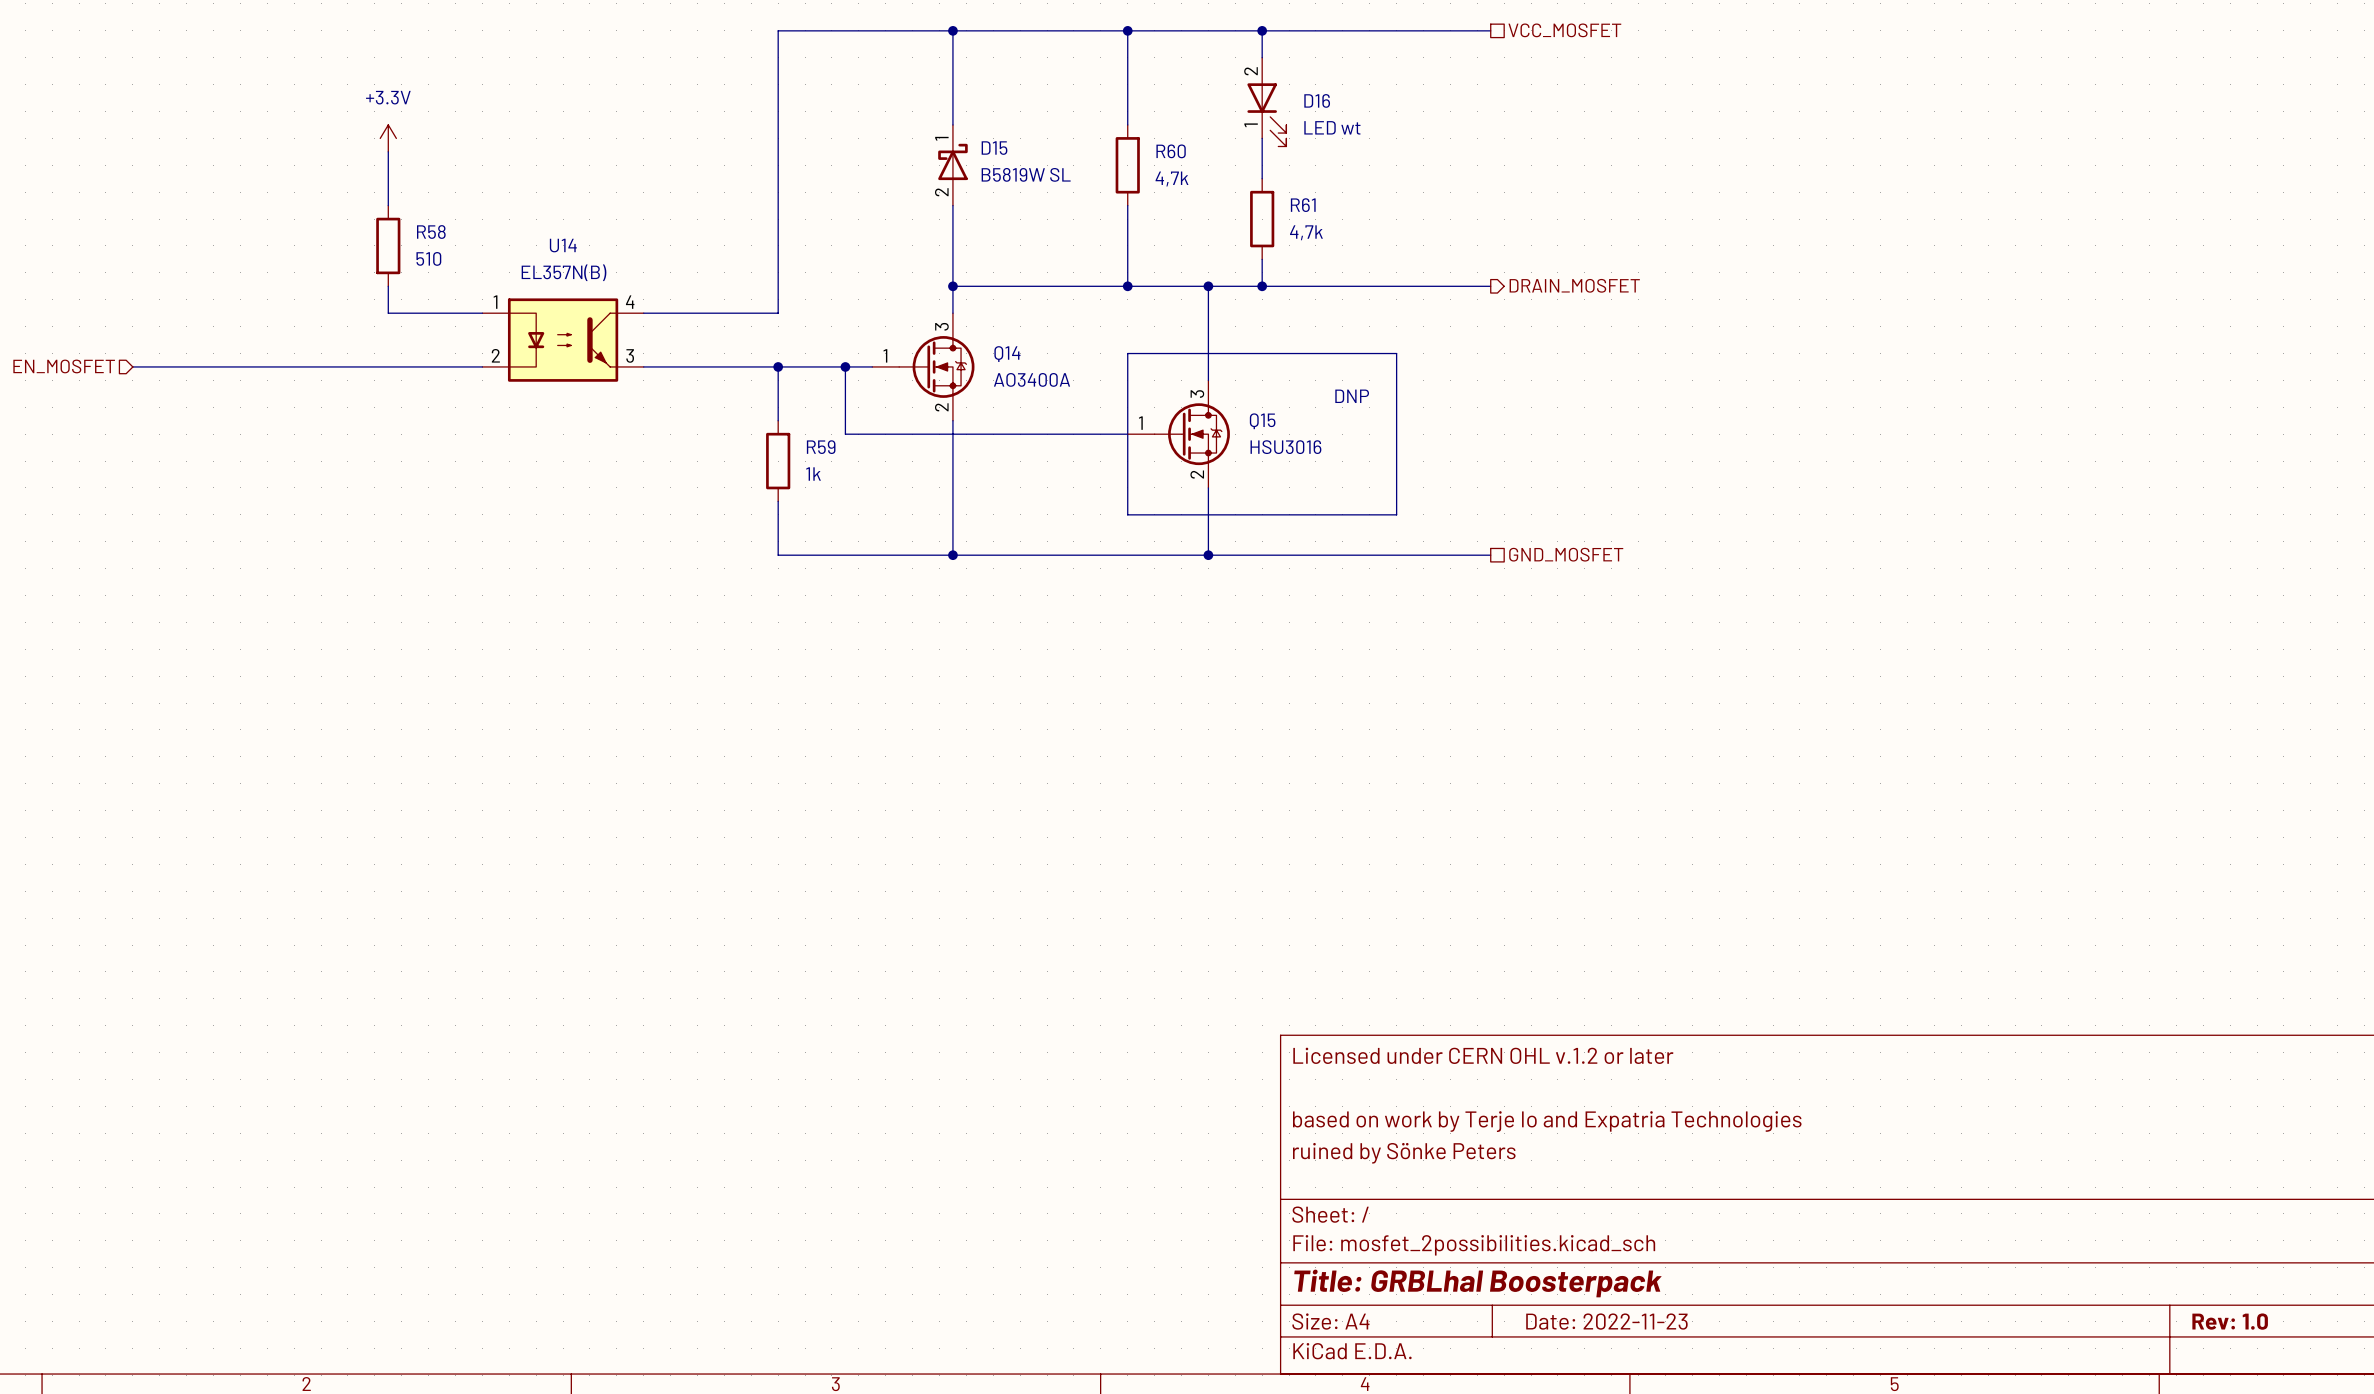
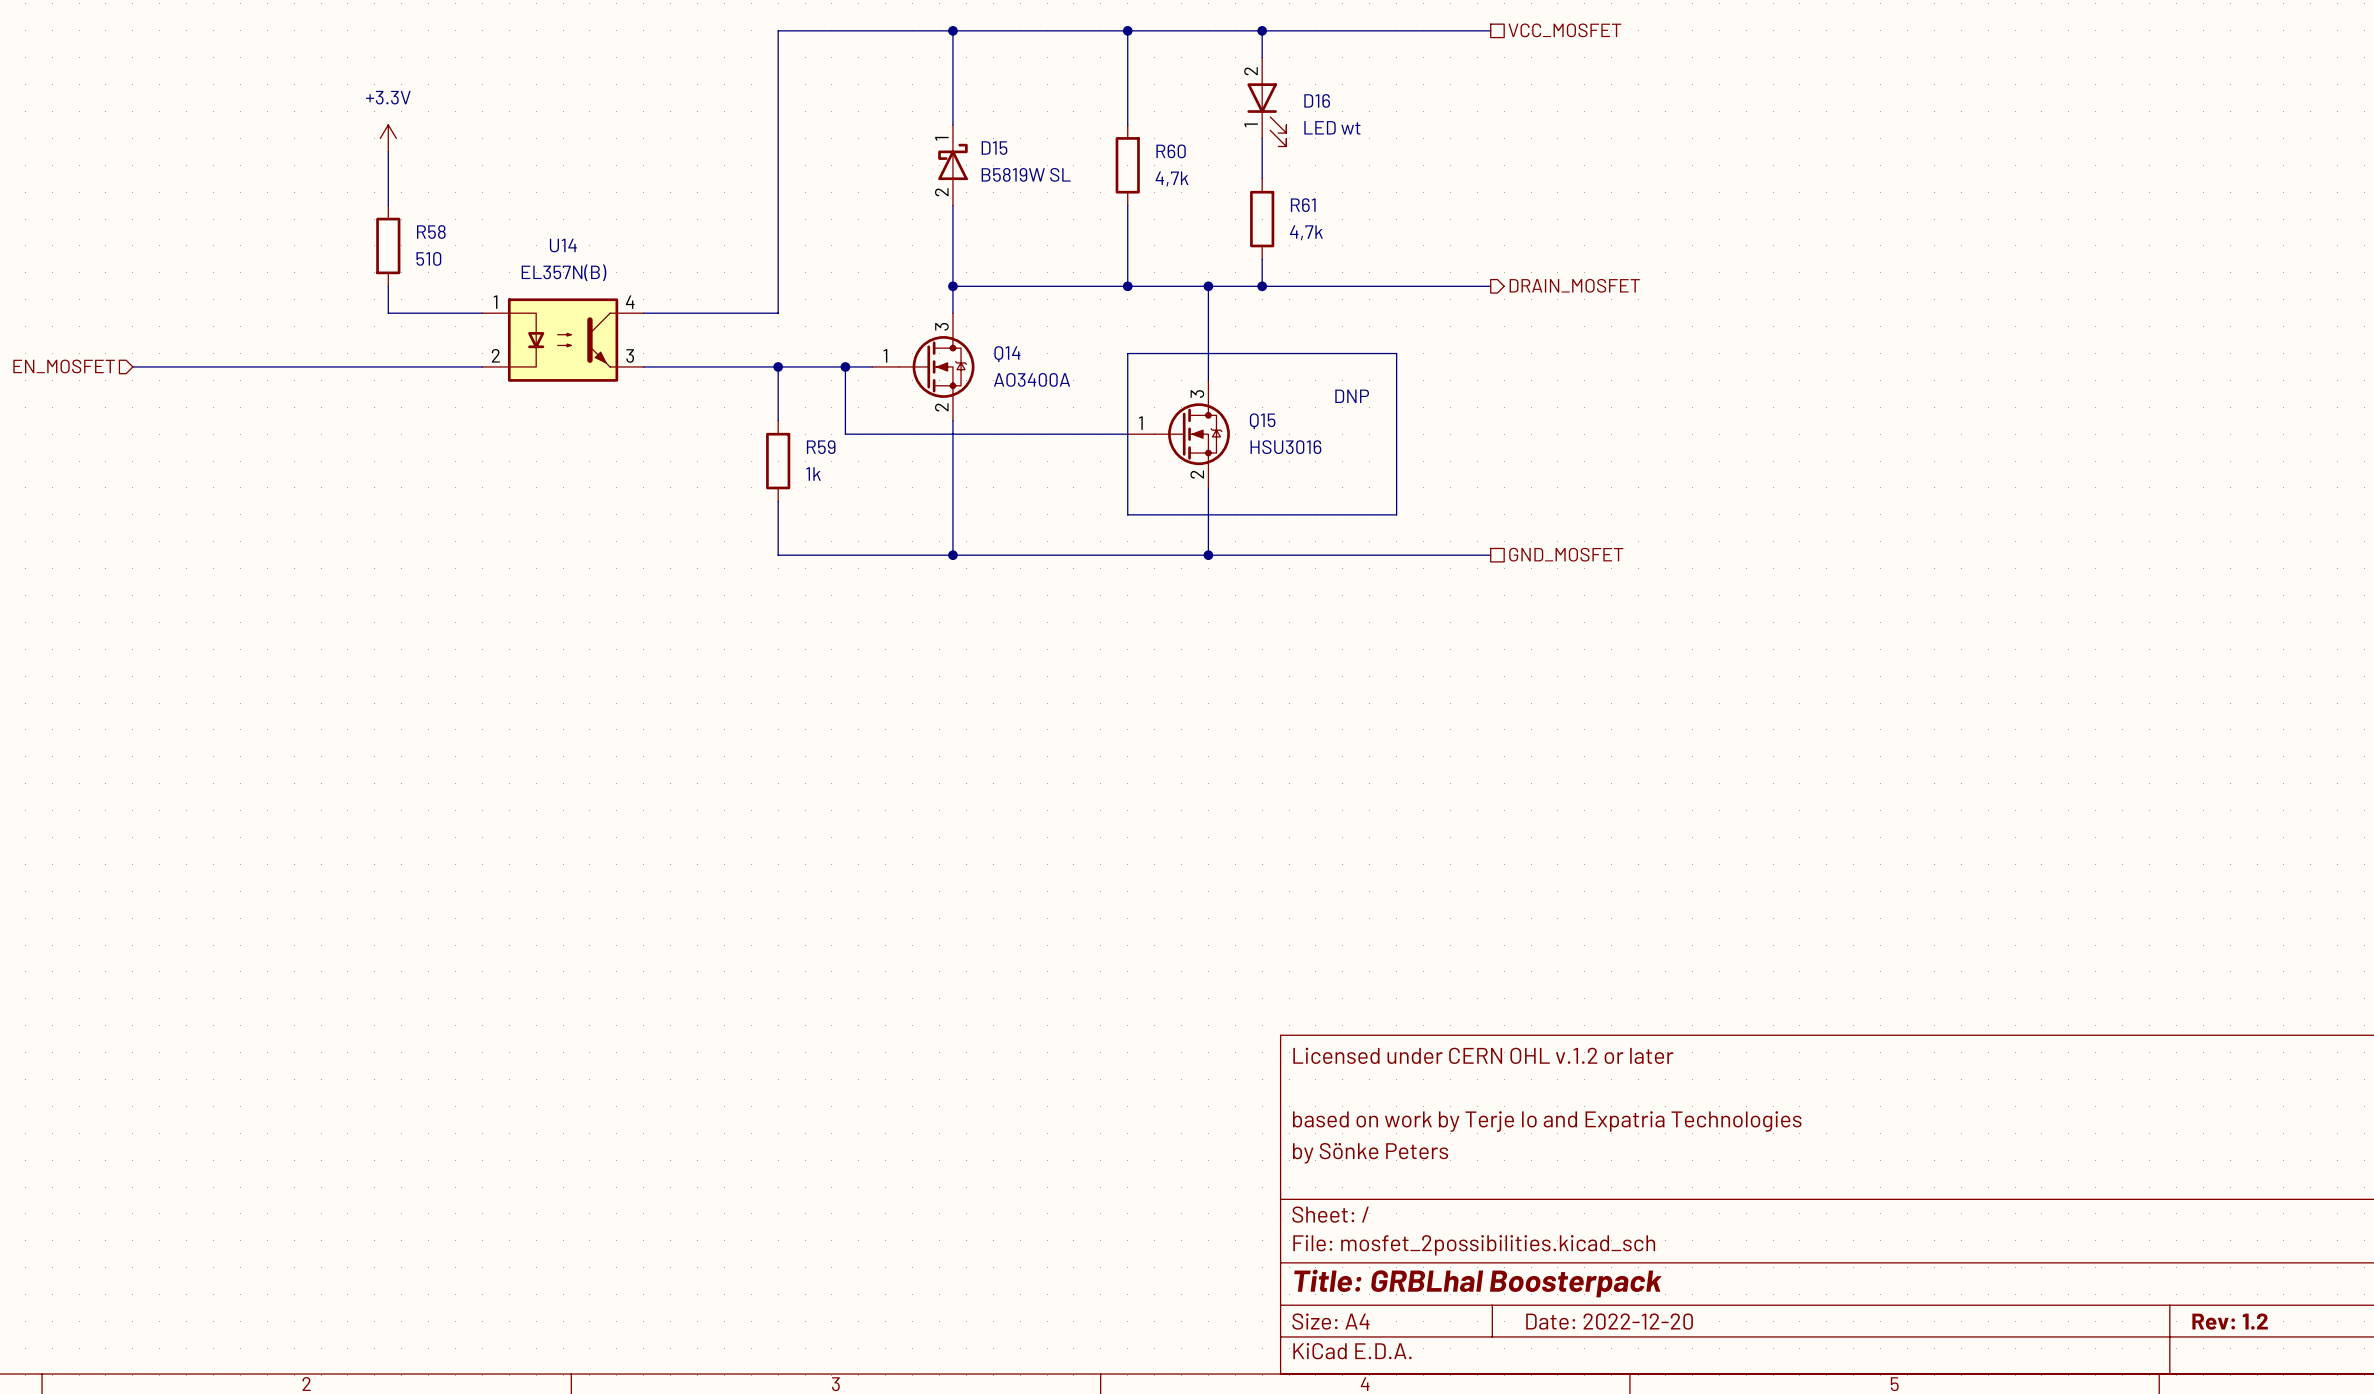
title block: ruined by Sönke Peters (1404, 1153) -> by Sönke Peters (1370, 1153)
title block: Date: 2022-11-23 (1606, 1321) -> Date: 2022-12-20 (1609, 1321)
title block: Rev: 1.0 (2230, 1321) -> Rev: 1.2 (2230, 1321)

